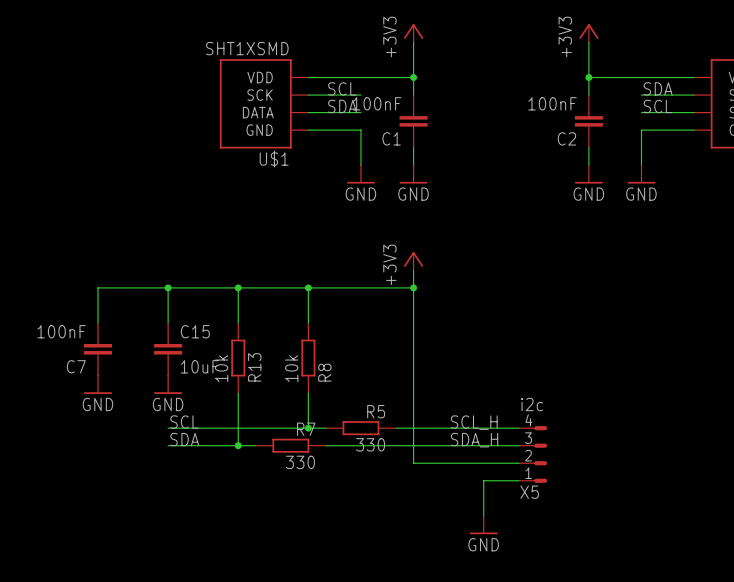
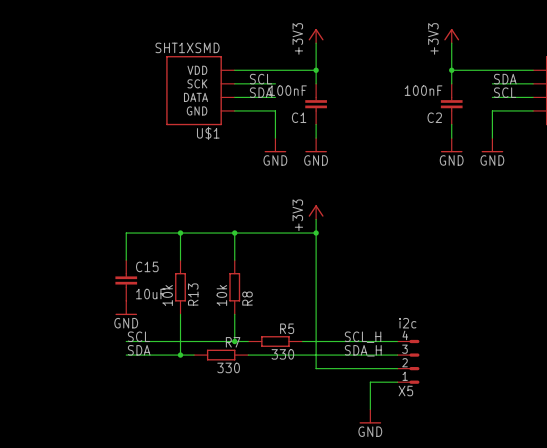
wire: (168, 287) (98, 287) (98, 322) -> none
junction: (168, 287) -> none
C7: 100nF (98, 349) -> none
power symbol: GND (98, 384) -> none

